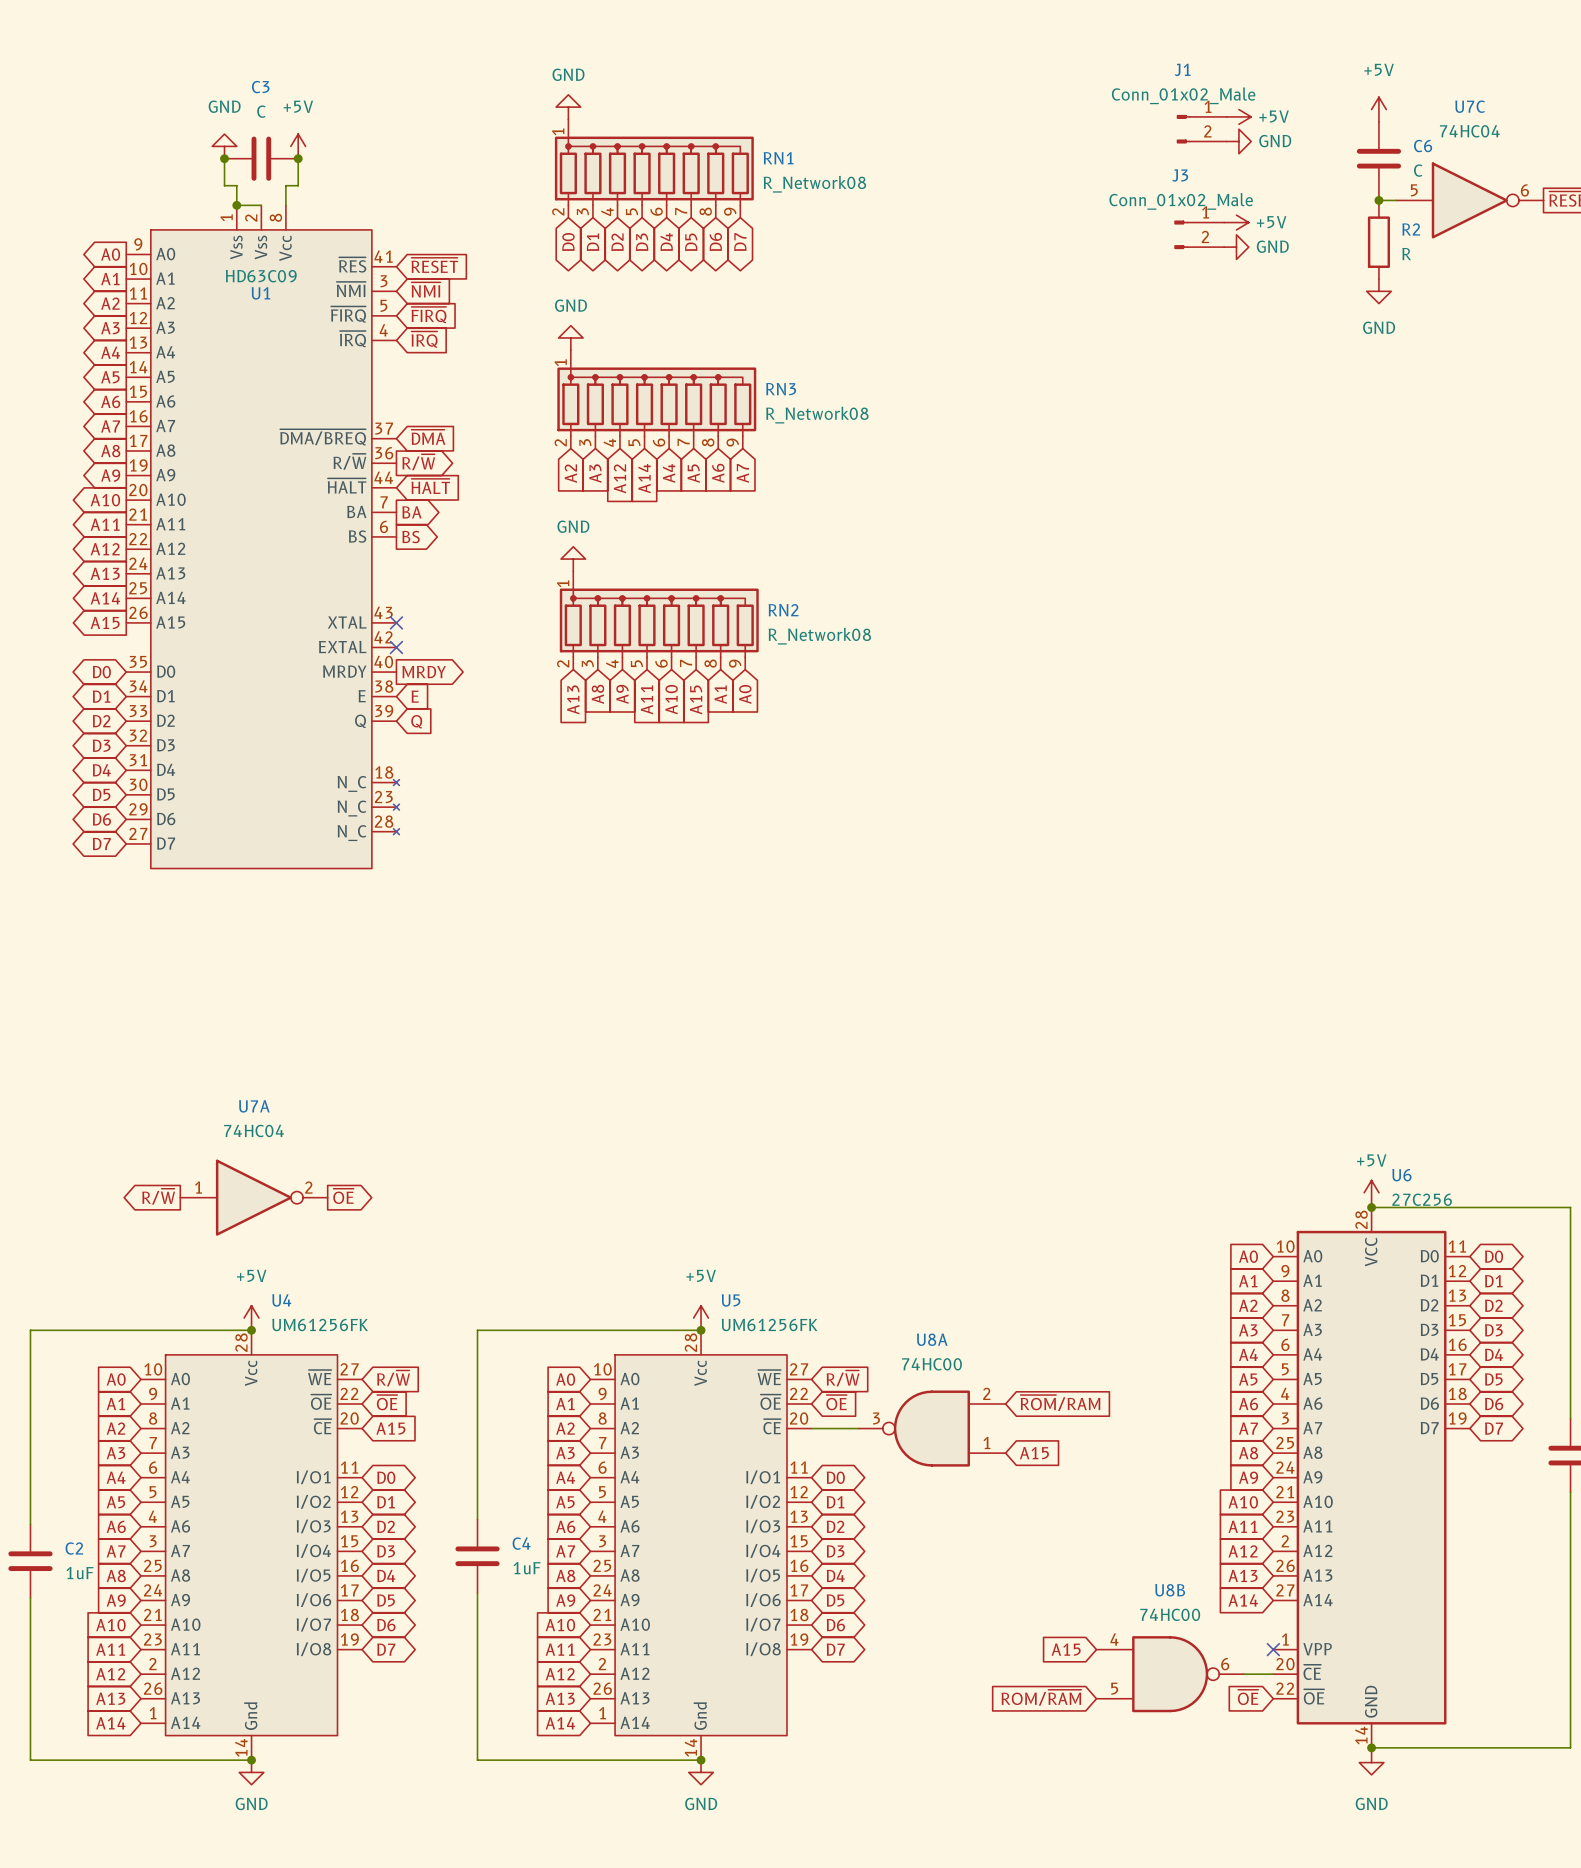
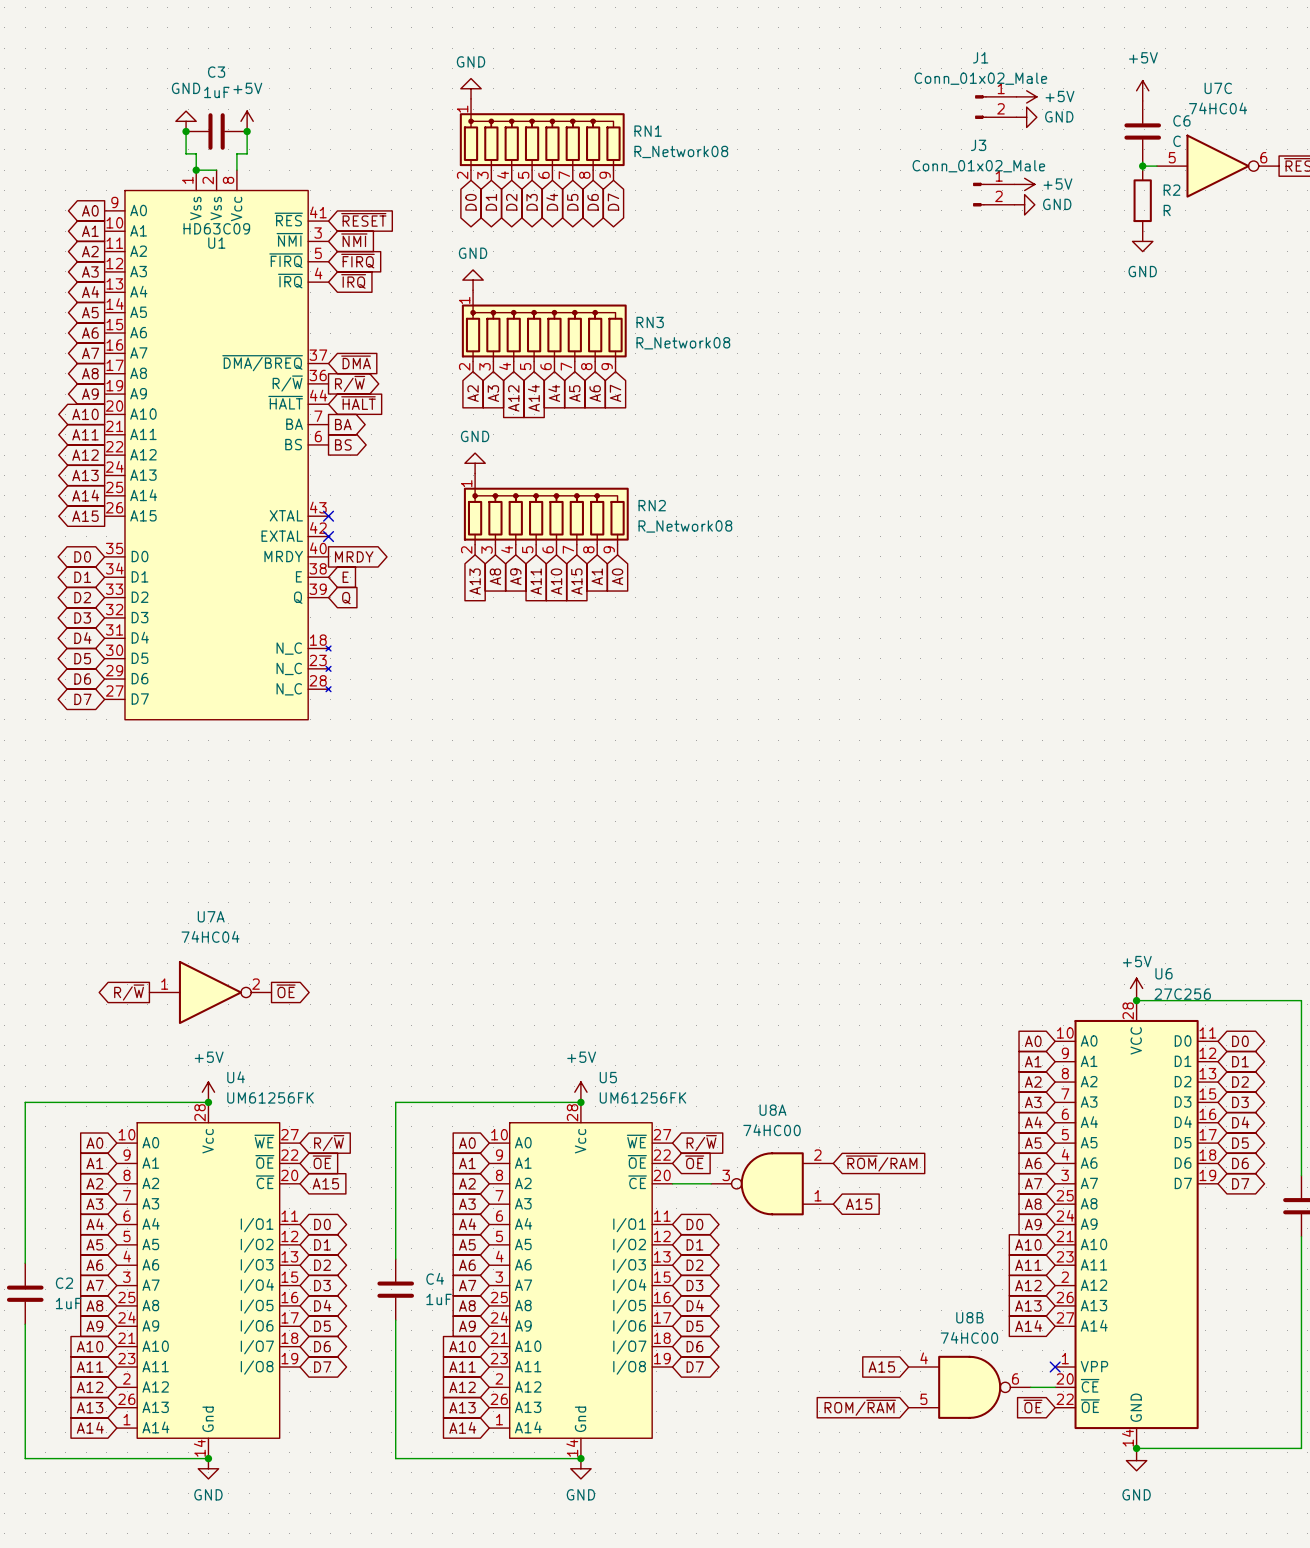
C3 value: C (261, 111) -> 1uF (216, 92)

